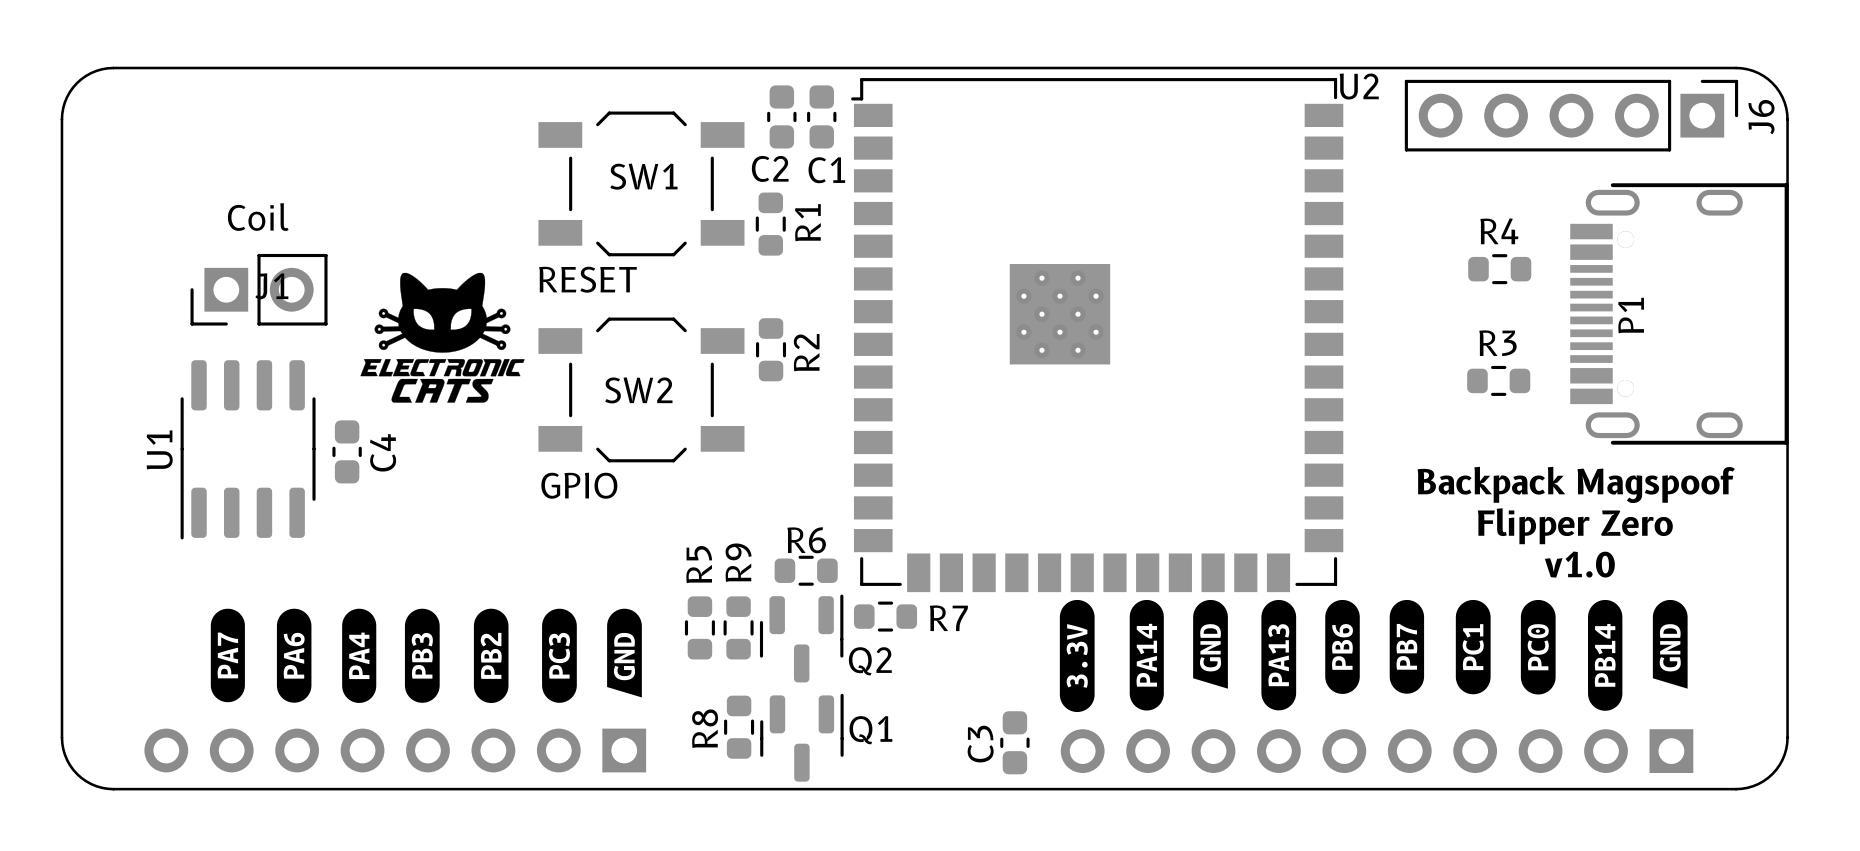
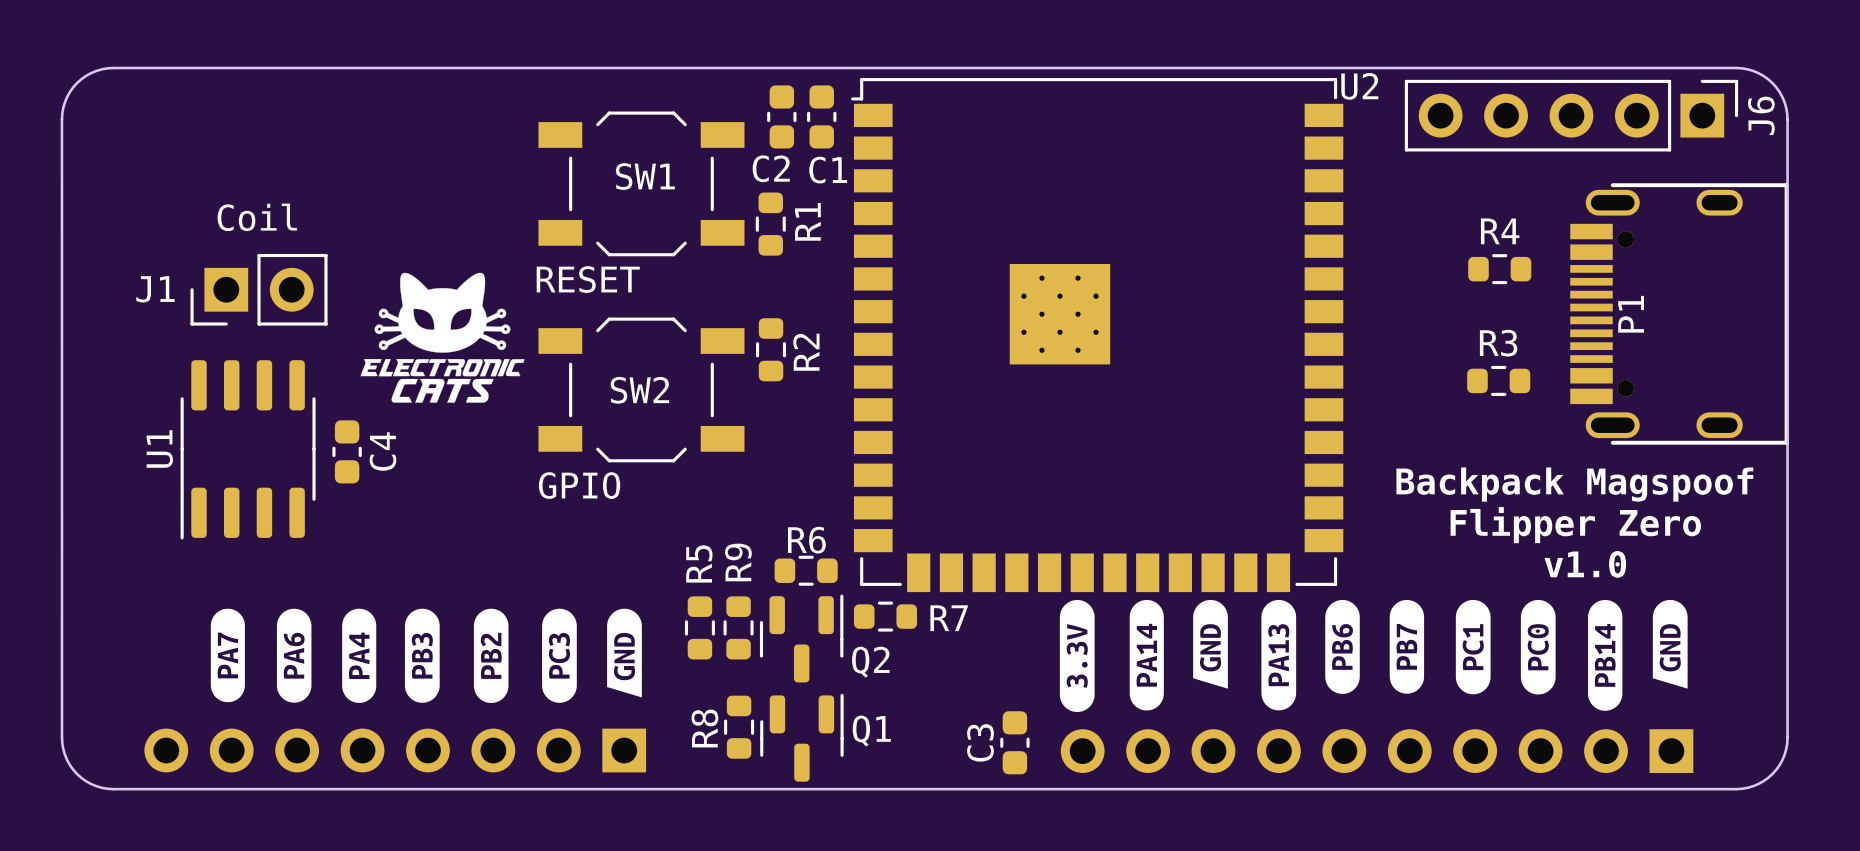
J1 name position: J1 (271, 286) -> J1 (155, 289)

